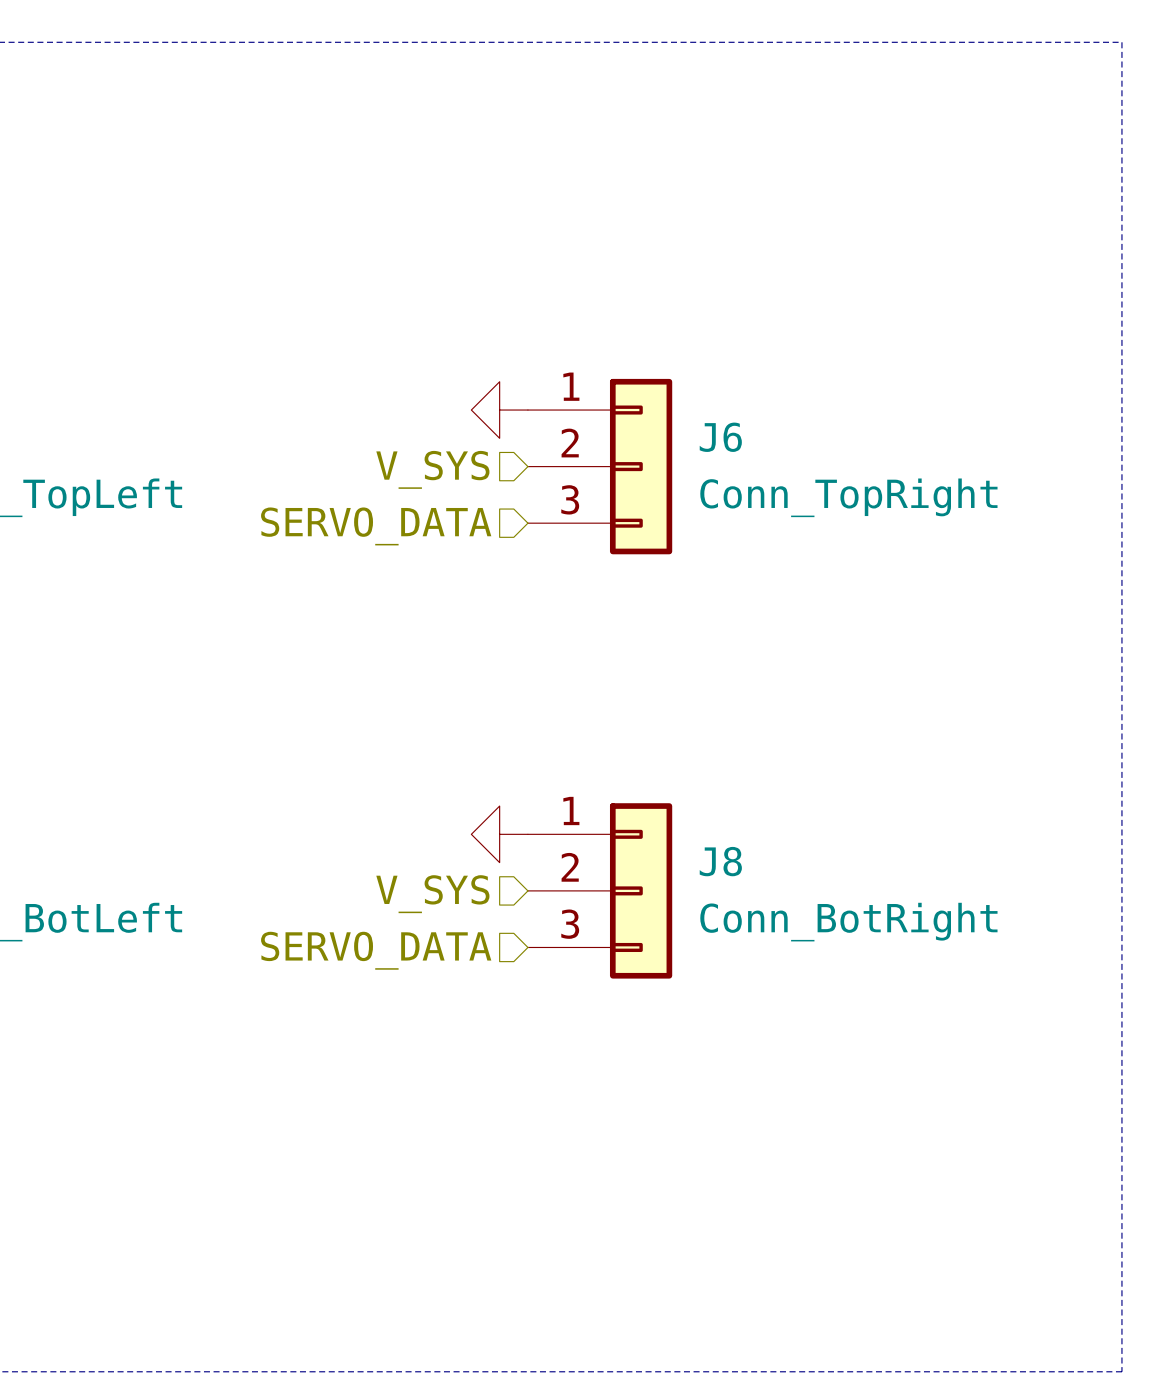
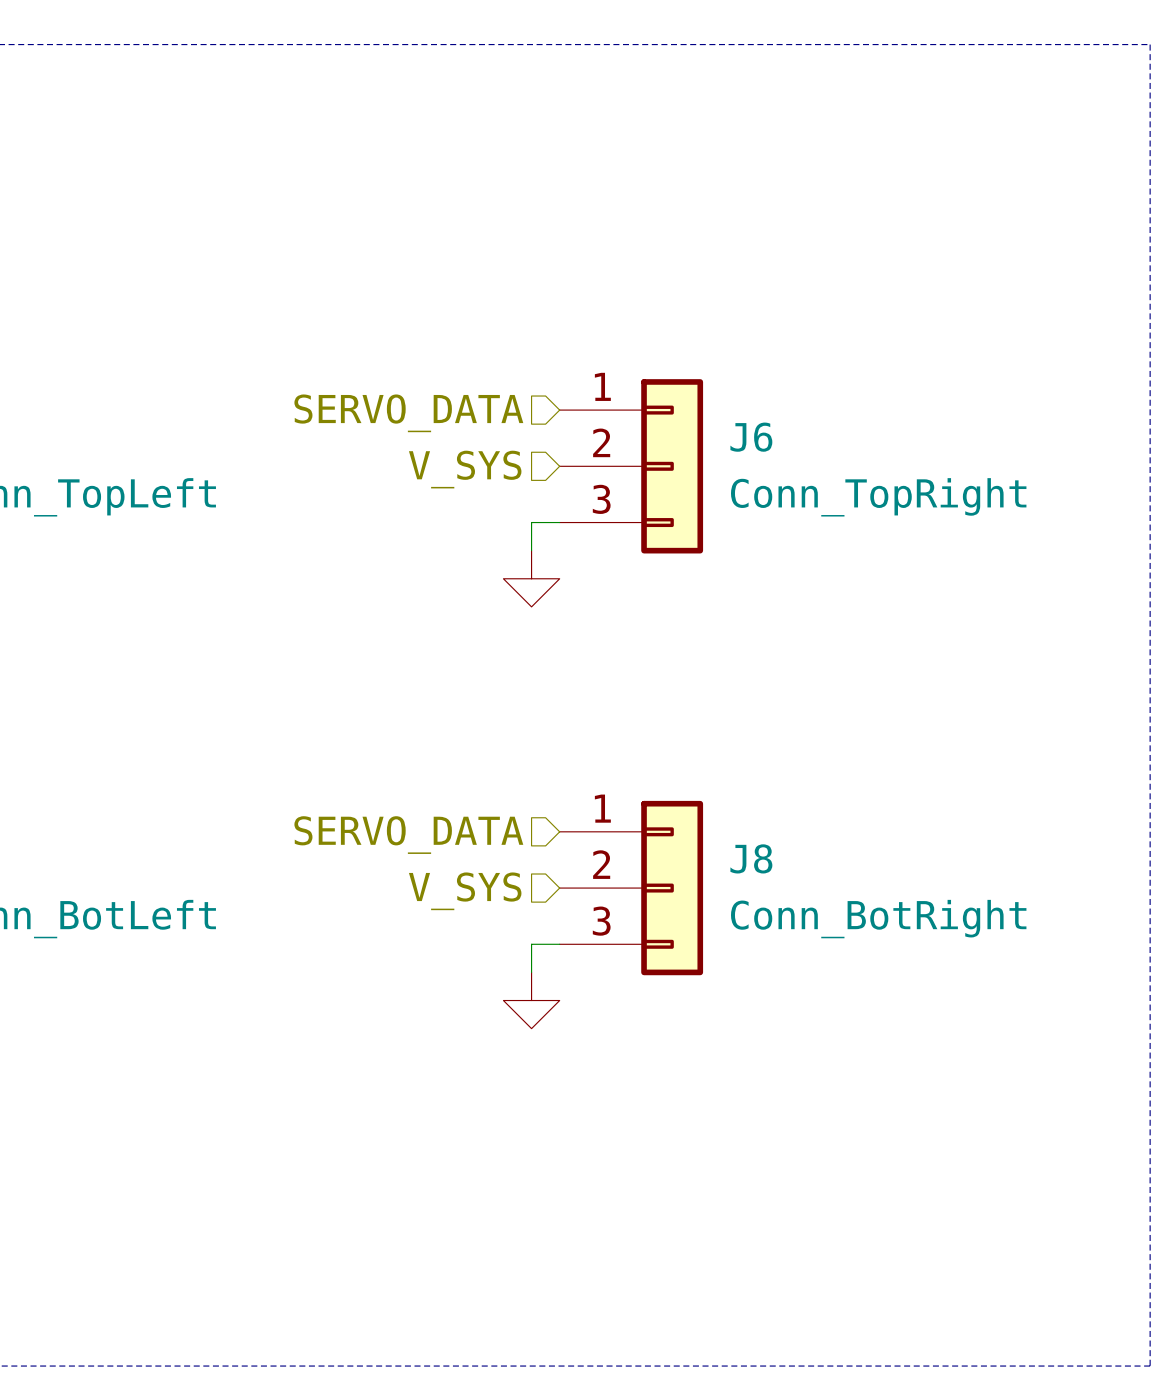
power symbol: (499, 410) -> none
wire: none -> (559, 522) (531, 522) (531, 550)
hierarchical label position: SERVO_DATA (376, 526) -> SERVO_DATA (408, 413)
power symbol: none -> (531, 578)
power symbol: (499, 834) -> none
wire: none -> (559, 944) (531, 944) (531, 972)
hierarchical label position: SERVO_DATA (376, 950) -> SERVO_DATA (408, 835)
power symbol: none -> (531, 1000)

